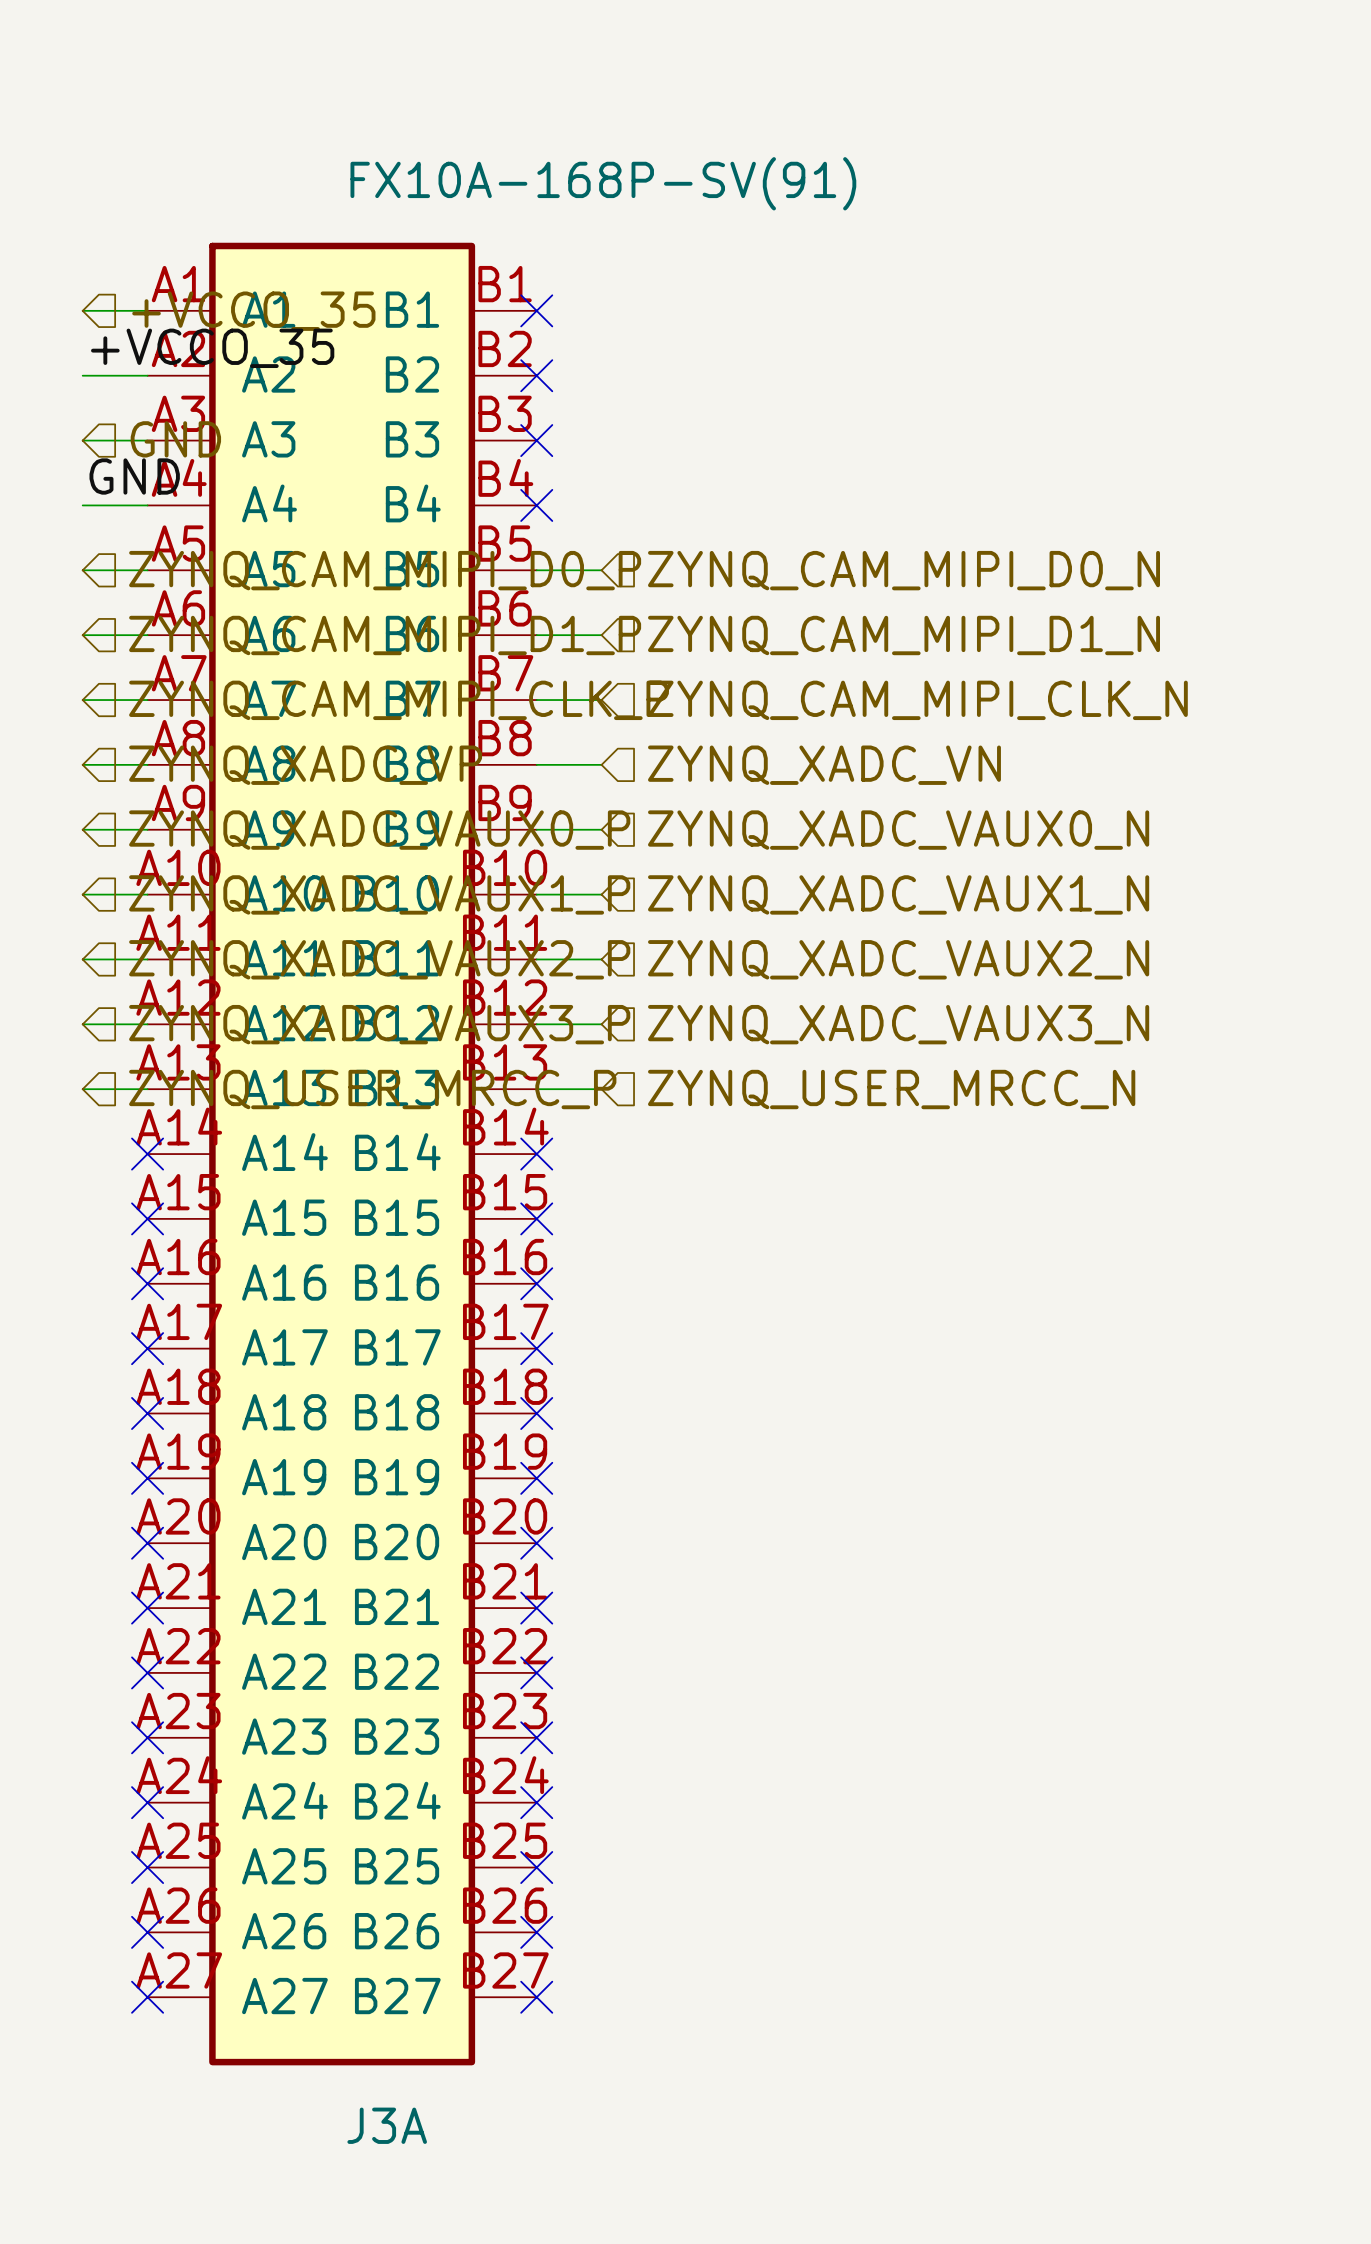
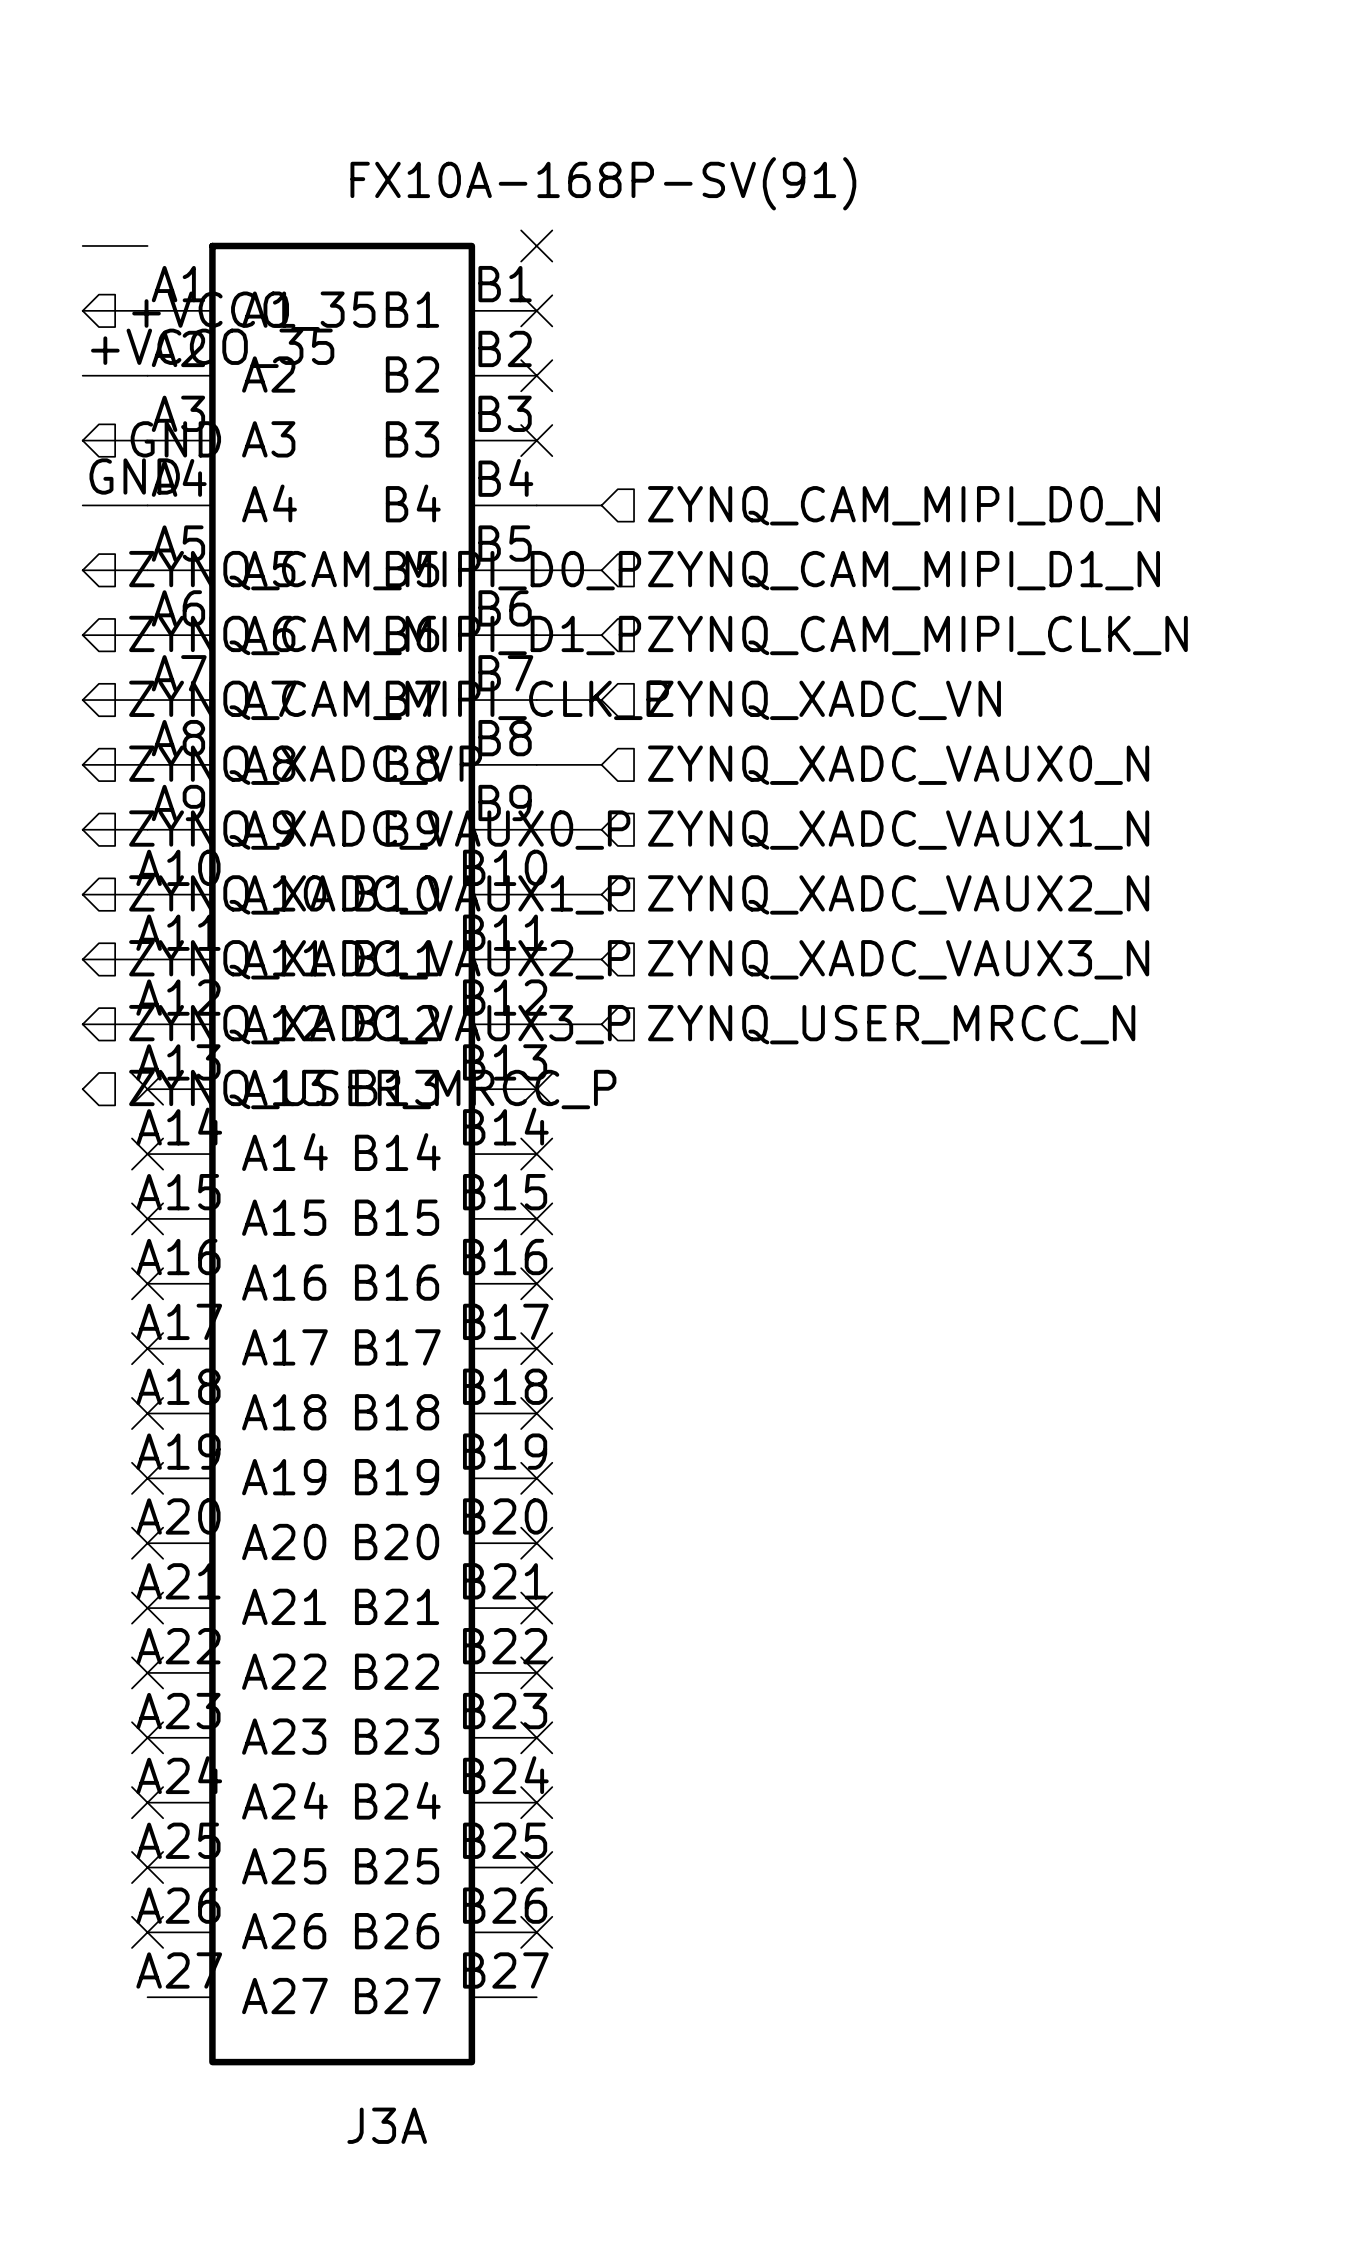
wire: none -> (82, 245) (147, 245)
no-connect mark: none -> (536, 245)
no-connect mark: (536, 505) -> none
hierarchical label: none -> ZYNQ_CAM_MIPI_D0_N (904, 505)
hierarchical label: ZYNQ_CAM_MIPI_D0_N (904, 570) -> ZYNQ_CAM_MIPI_D1_N (904, 570)
hierarchical label: ZYNQ_CAM_MIPI_D1_N (904, 635) -> ZYNQ_CAM_MIPI_CLK_N (917, 635)
hierarchical label: ZYNQ_CAM_MIPI_CLK_N (917, 700) -> ZYNQ_XADC_VN (824, 700)
hierarchical label: ZYNQ_XADC_VN (824, 765) -> ZYNQ_XADC_VAUX0_N (898, 765)
hierarchical label: ZYNQ_XADC_VAUX0_N (898, 830) -> ZYNQ_XADC_VAUX1_N (898, 830)
hierarchical label: ZYNQ_XADC_VAUX1_N (898, 894) -> ZYNQ_XADC_VAUX2_N (898, 894)
hierarchical label: ZYNQ_XADC_VAUX2_N (898, 959) -> ZYNQ_XADC_VAUX3_N (898, 959)
hierarchical label: ZYNQ_XADC_VAUX3_N (898, 1024) -> ZYNQ_USER_MRCC_N (891, 1024)
wire: (82, 1089) (147, 1089) -> none
no-connect mark: none -> (147, 1089)
wire: (536, 1089) (601, 1089) -> (536, 505) (601, 505)
no-connect mark: none -> (536, 1089)
hierarchical label: ZYNQ_USER_MRCC_N (891, 1089) -> none
no-connect mark: (147, 1997) -> none
no-connect mark: (536, 1997) -> none

